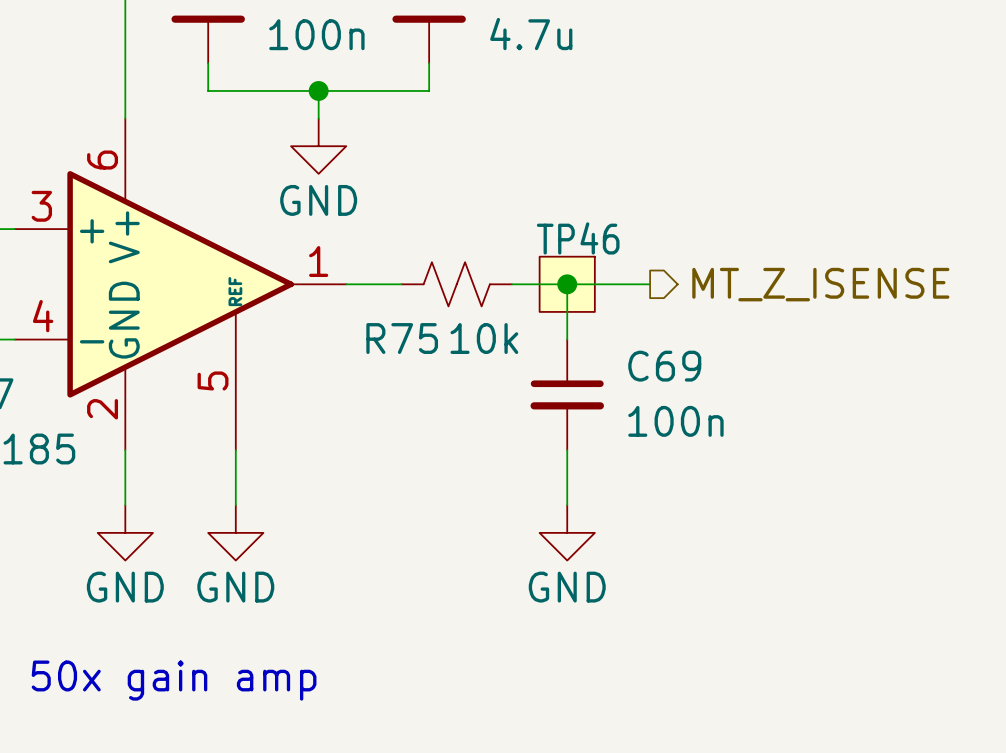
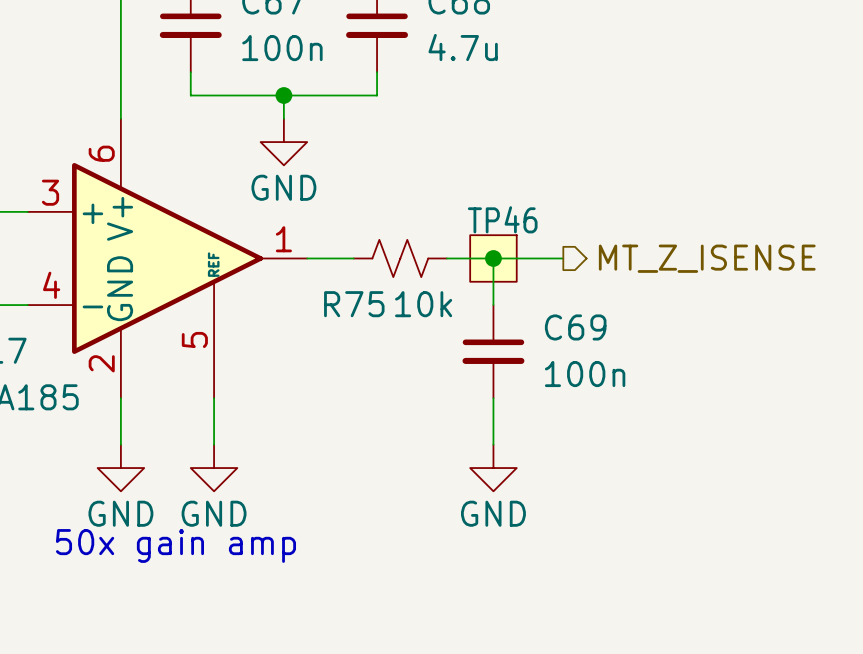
text position: 50x gain amp (174, 680) -> 50x gain amp (175, 545)

